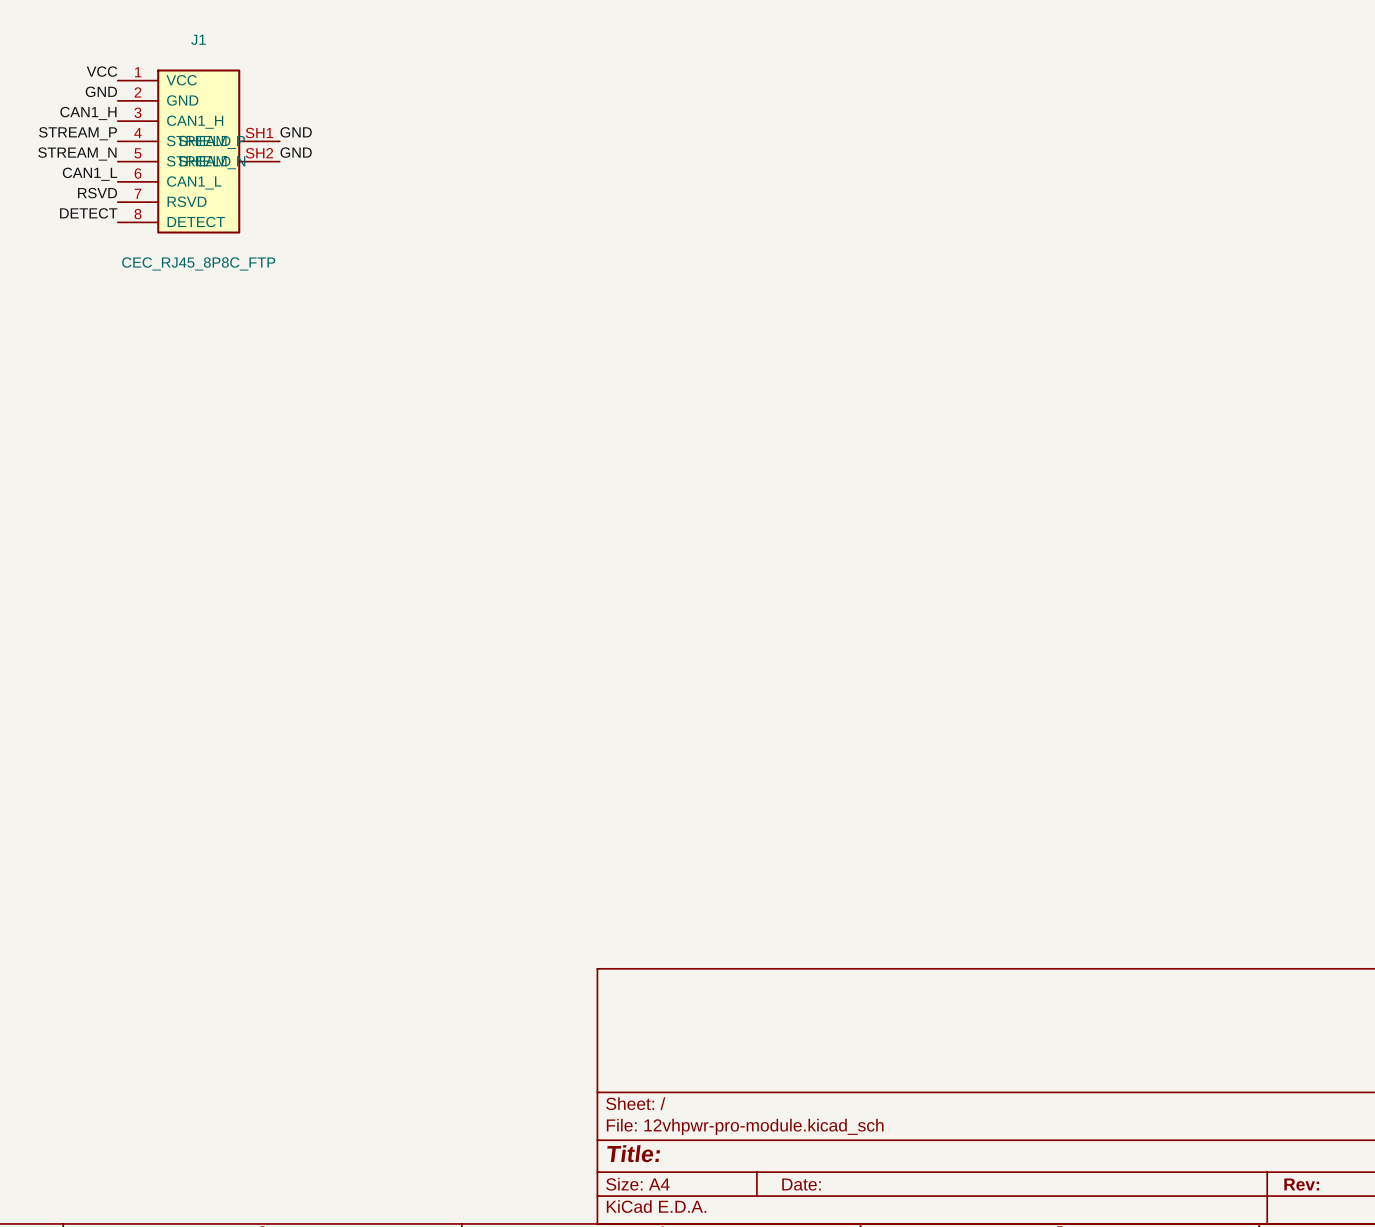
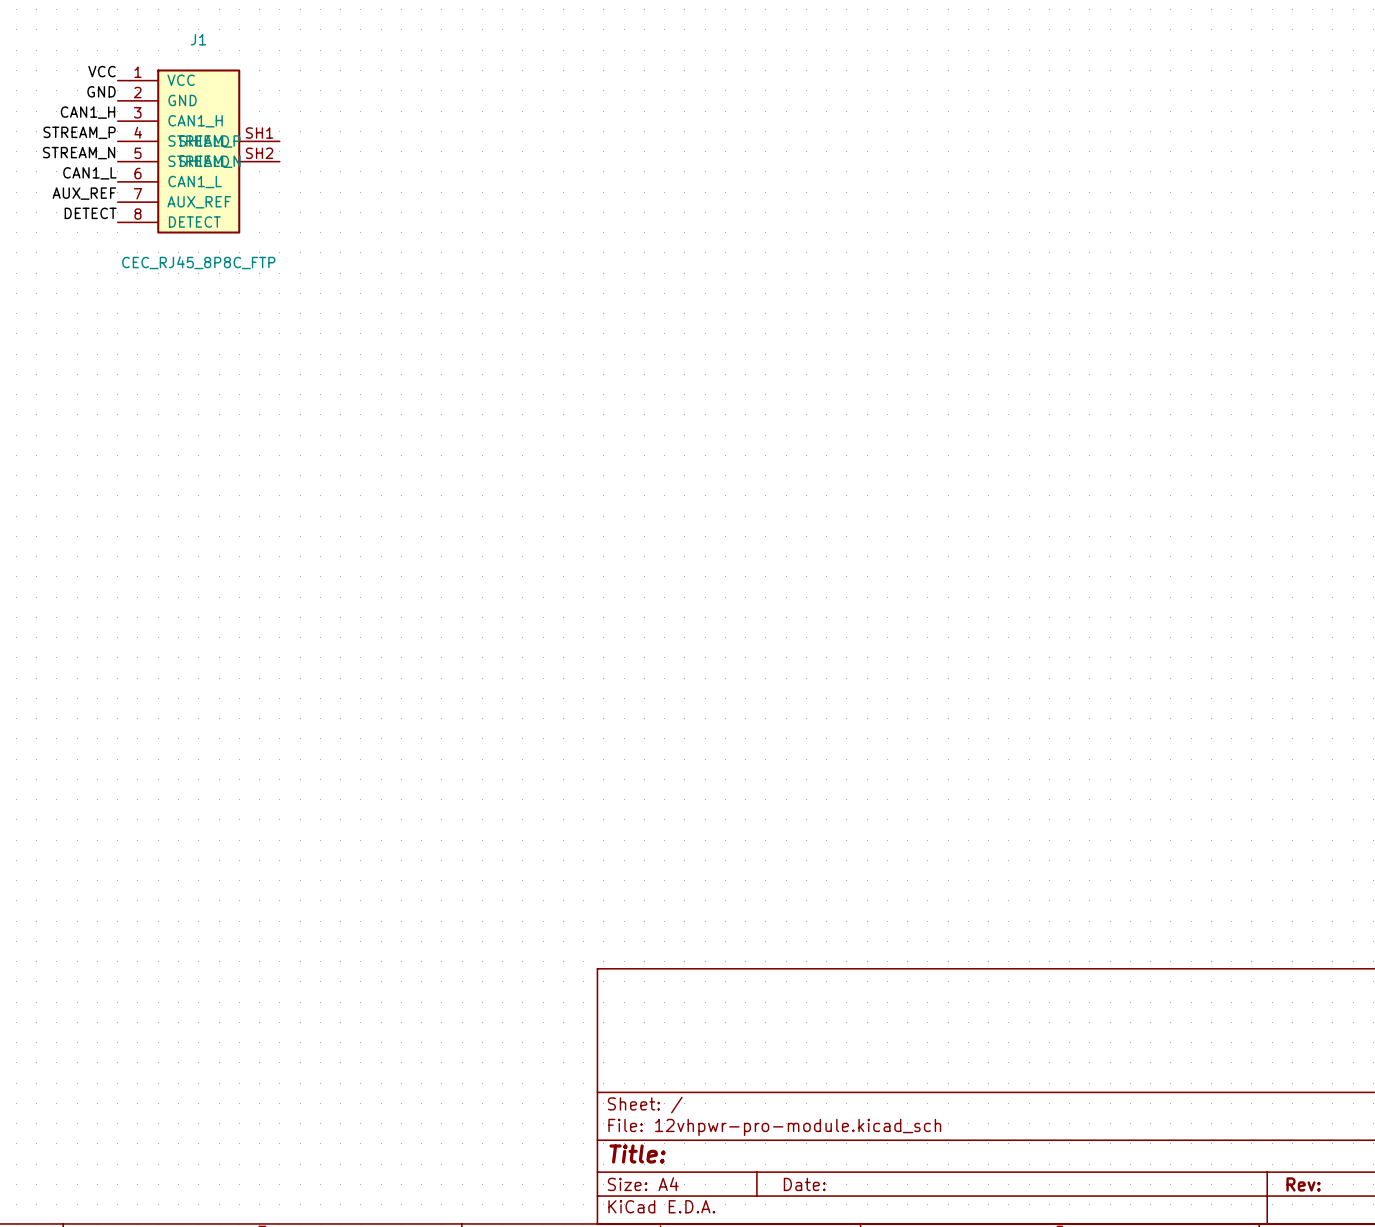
label: GND (296, 132) -> none
label: GND (296, 152) -> none
label: RSVD (97, 193) -> AUX_REF (84, 193)
J1 pin name: RSVD (187, 201) -> AUX_REF (199, 202)

